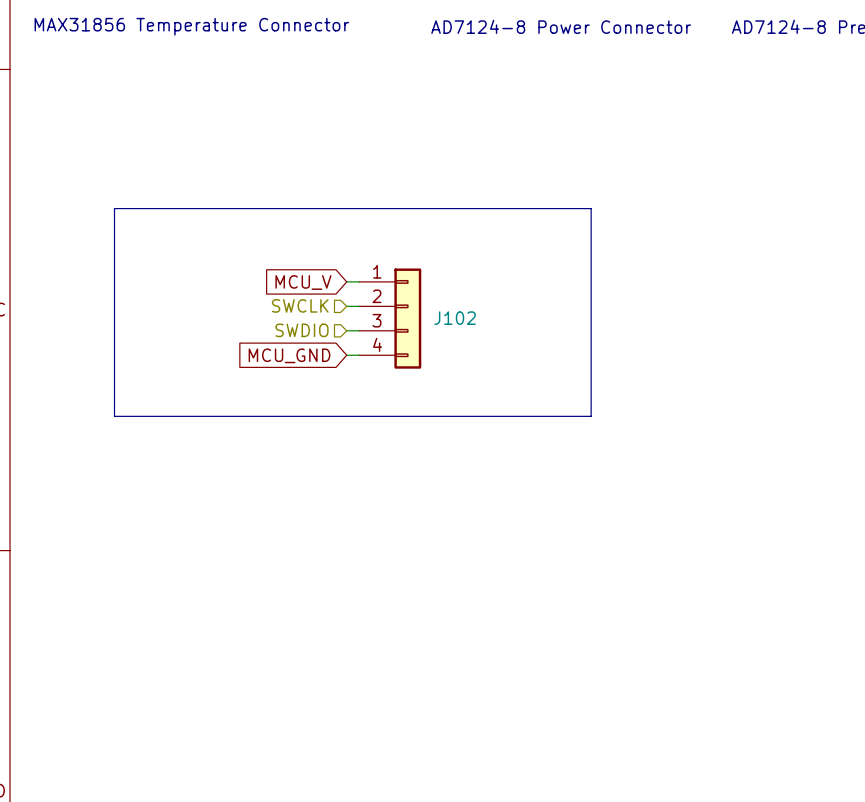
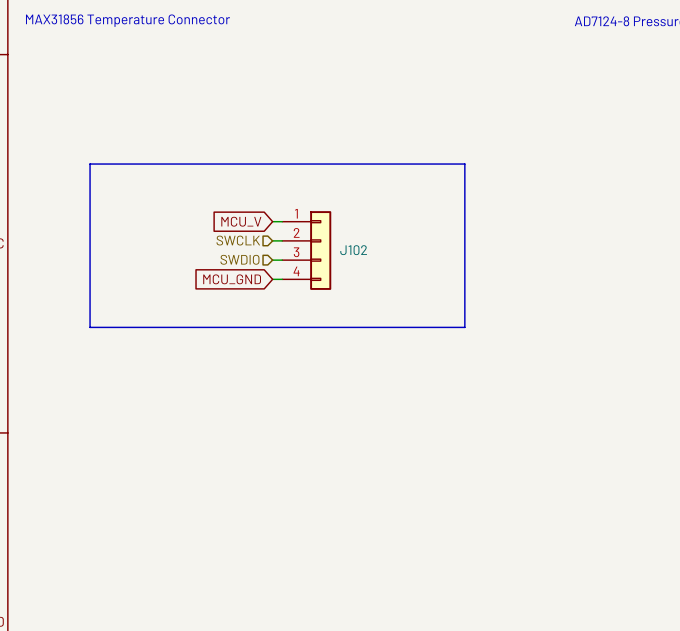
text: AD7124-8 Power Connector (561, 26) -> none

